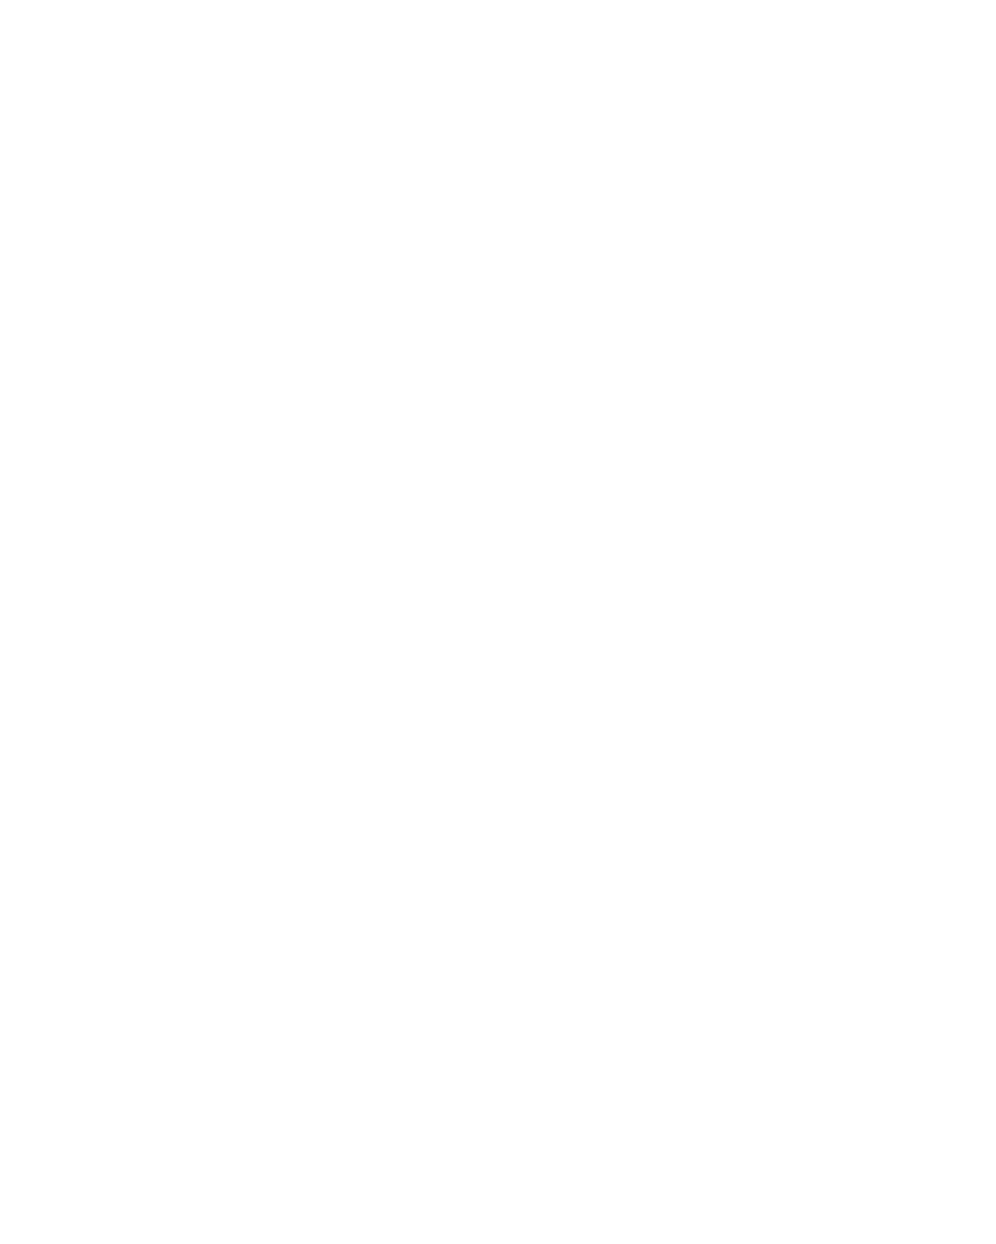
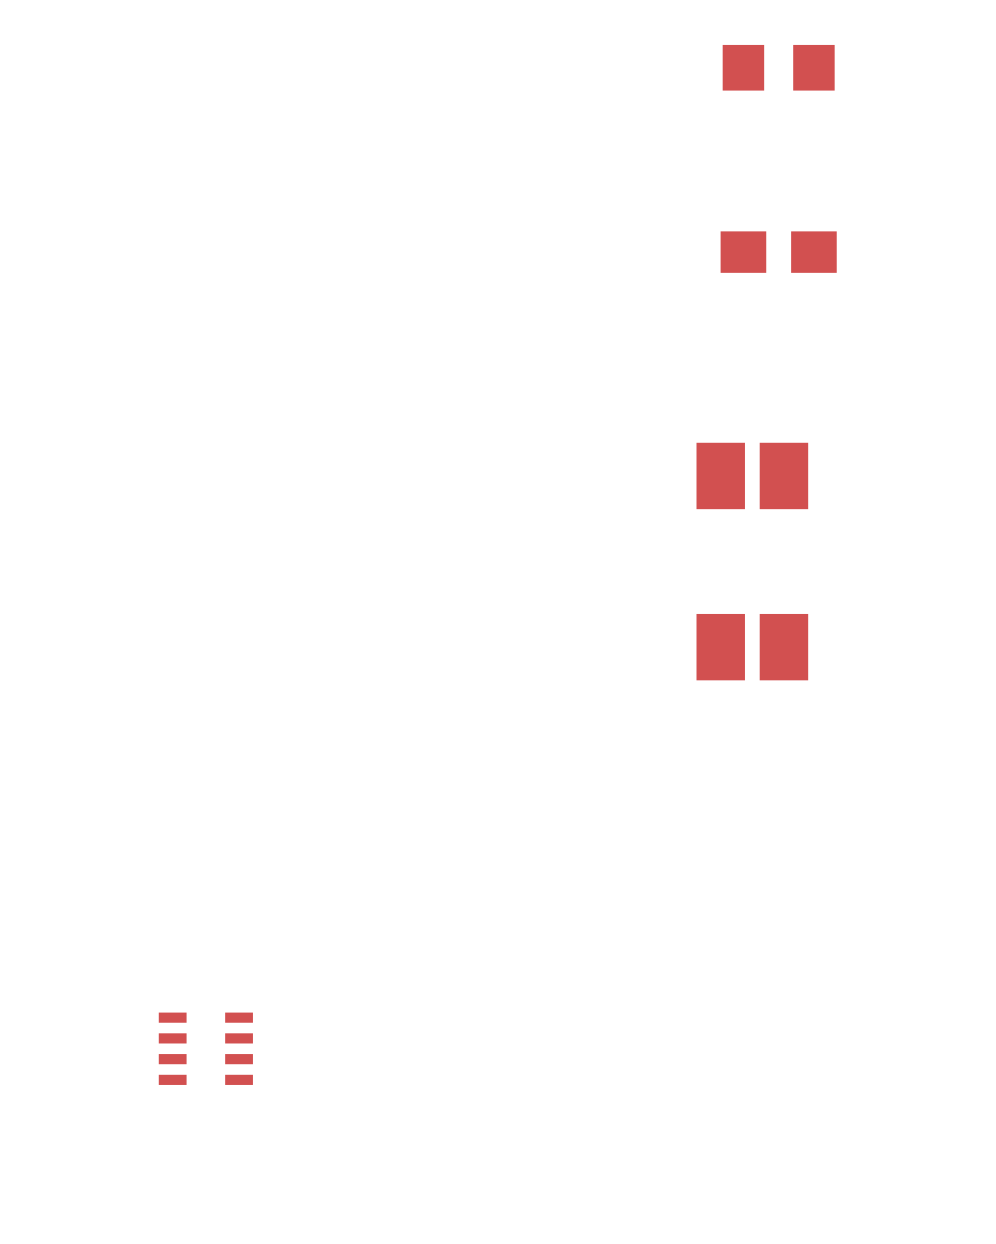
part: none -> (778, 67)
part: none -> (778, 252)
part: none -> (752, 475)
part: none -> (752, 647)
part: none -> (205, 1048)

